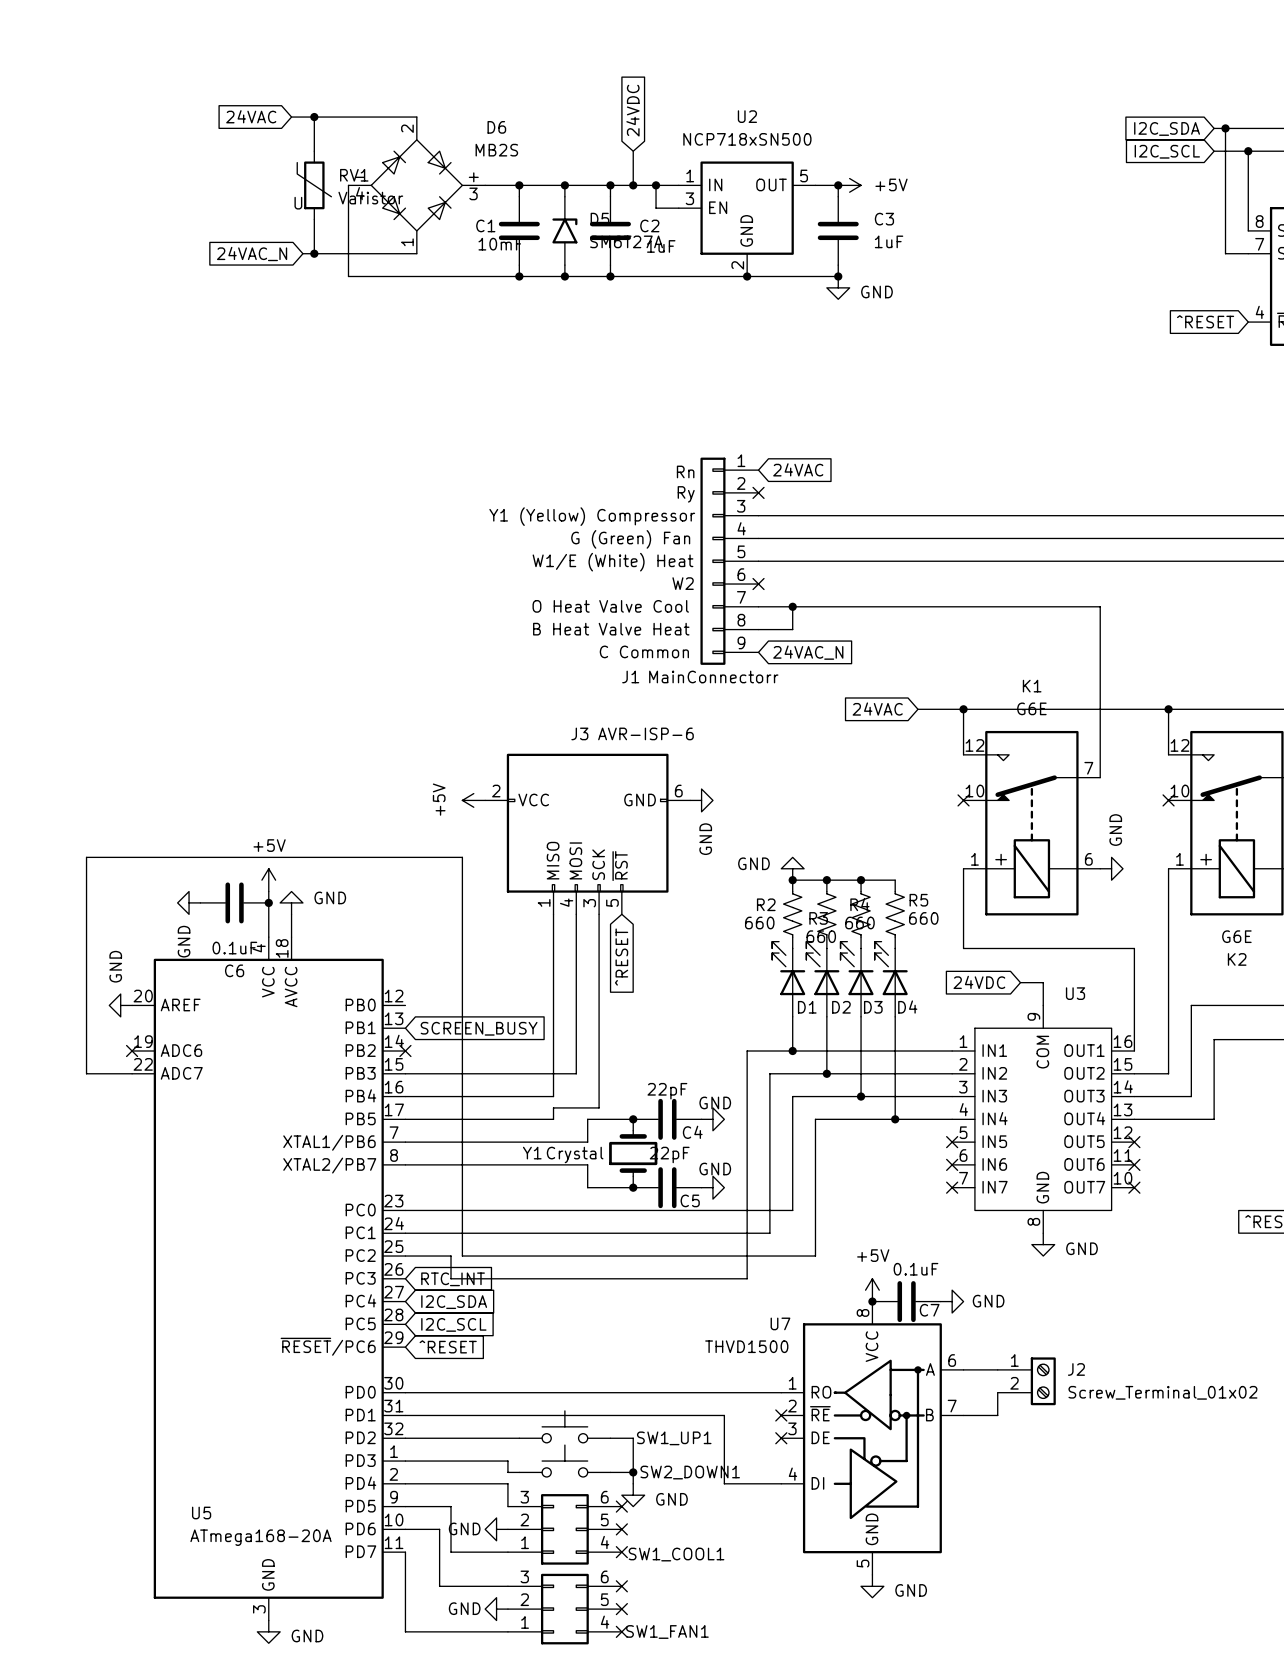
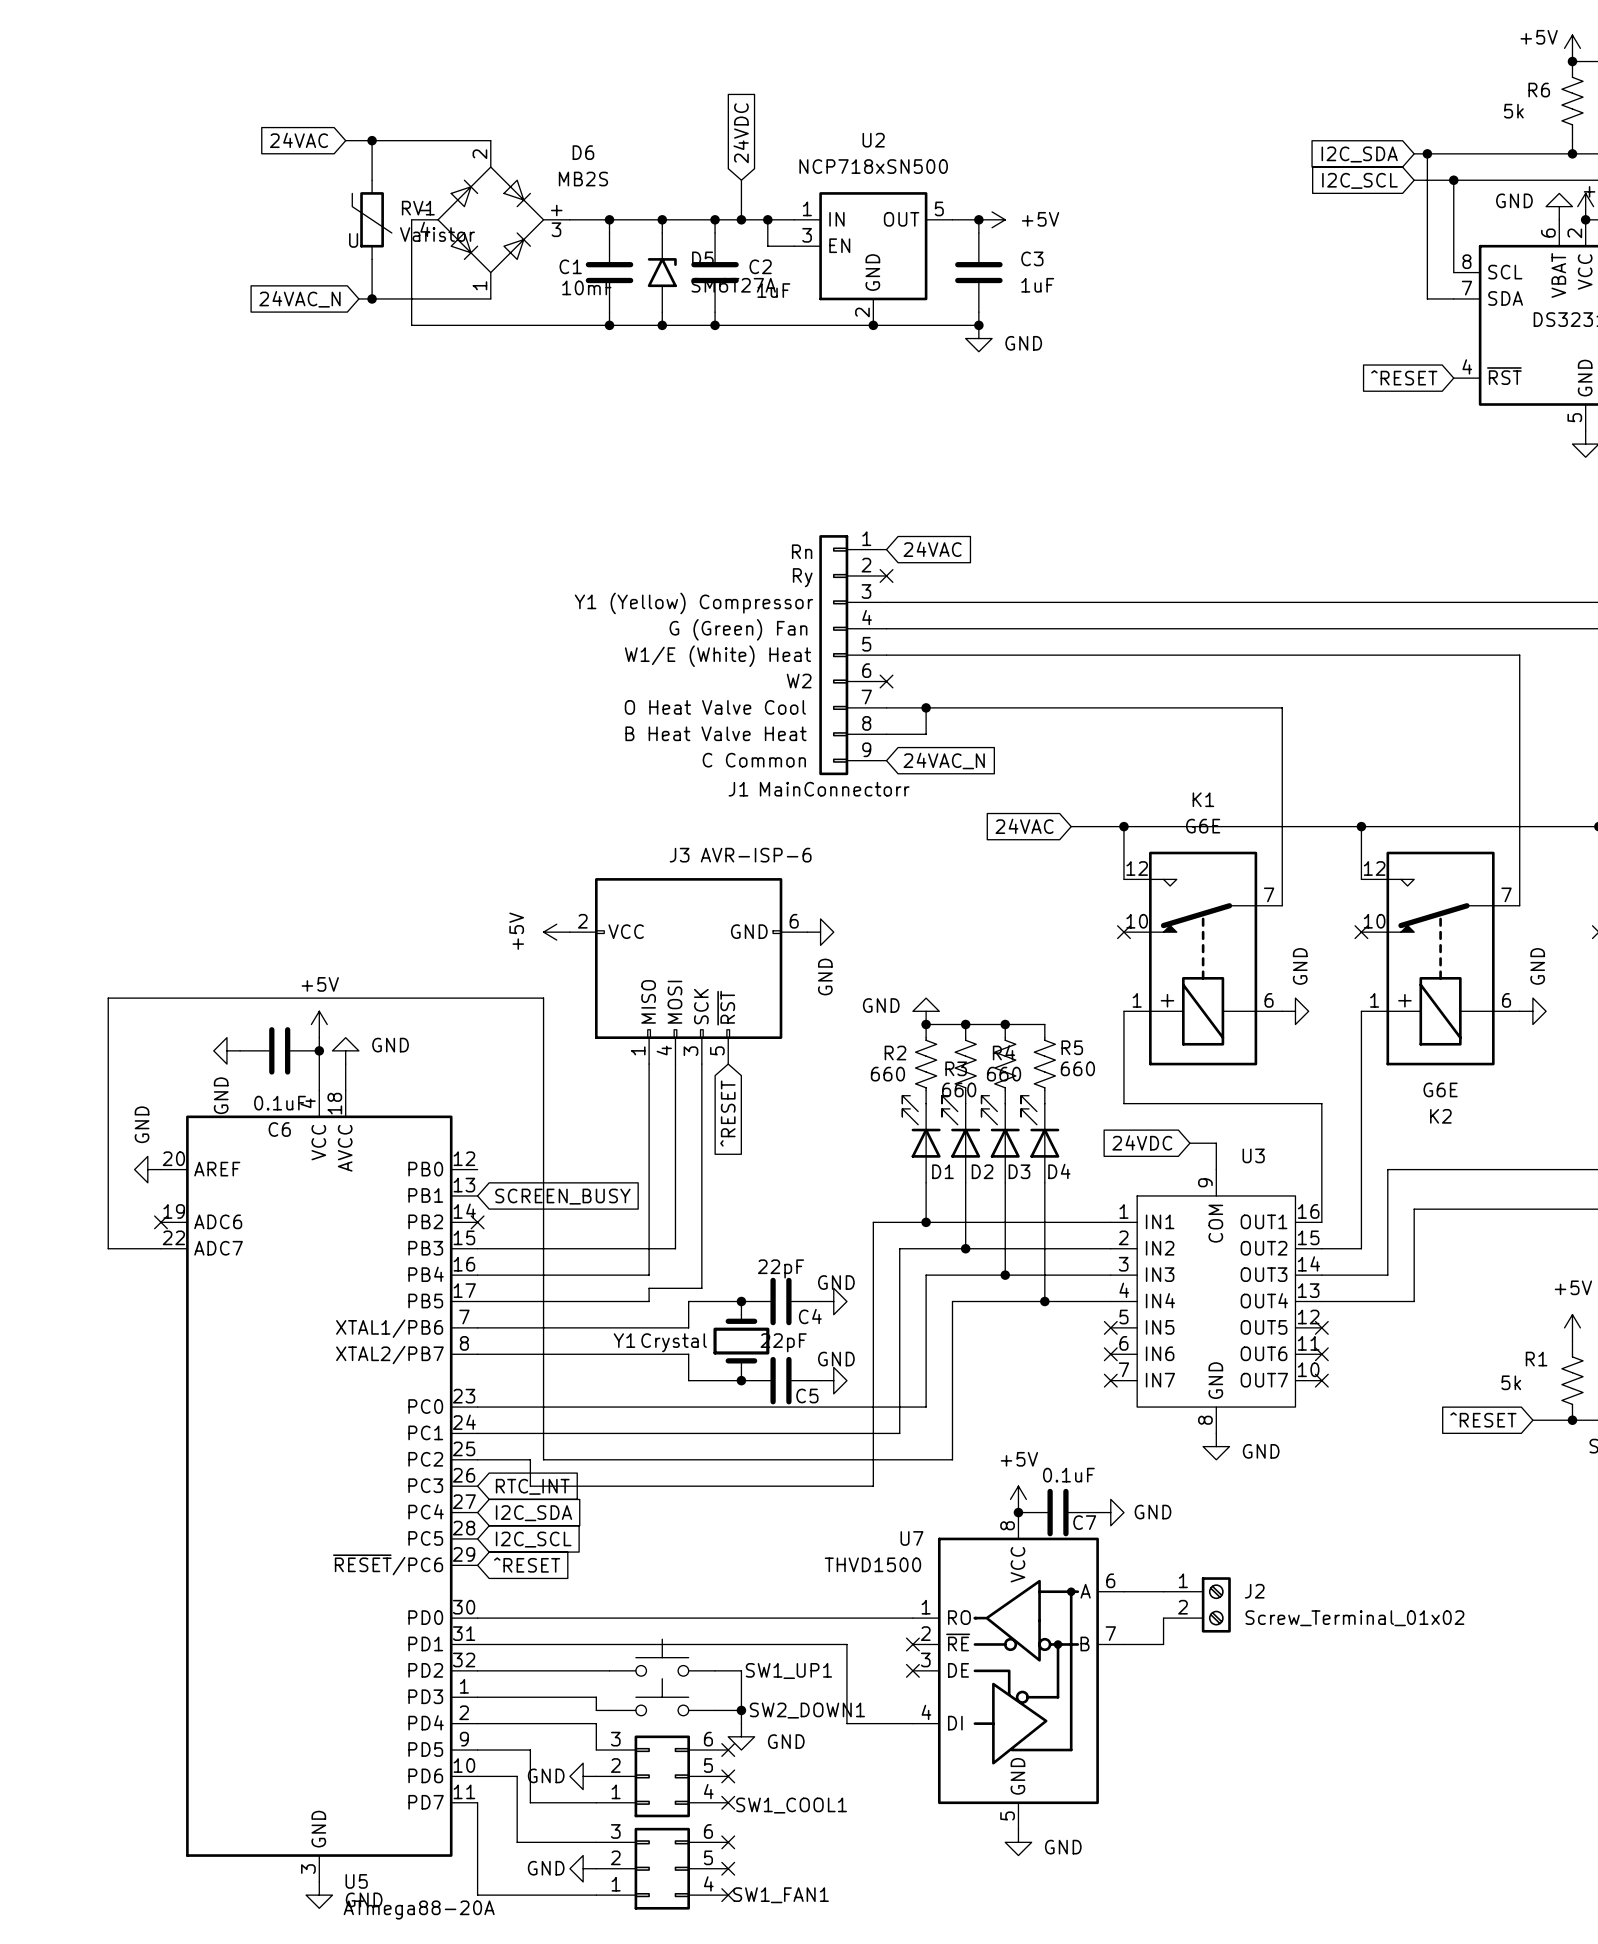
U5 name position: U5 (201, 1513) -> U5 (356, 1881)
U5 value: ATmega168-20A (260, 1537) -> ATmega88-20A (419, 1910)

